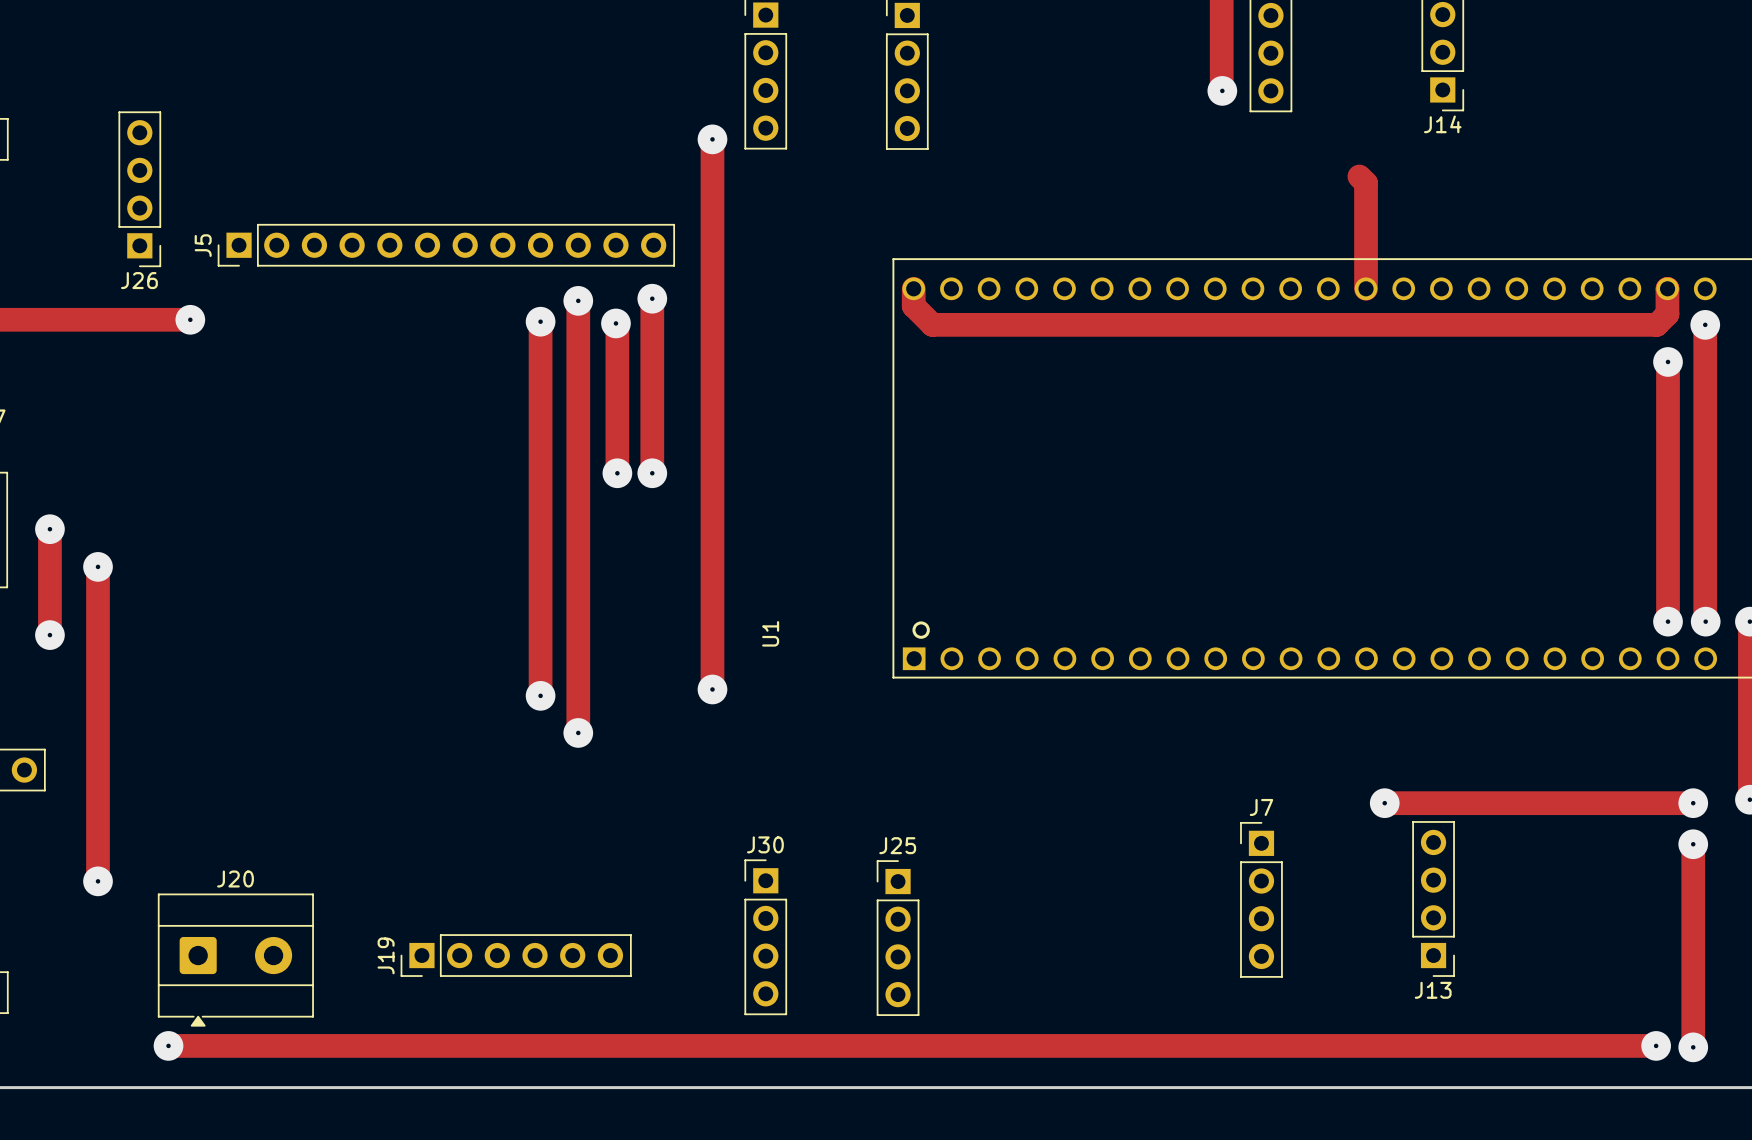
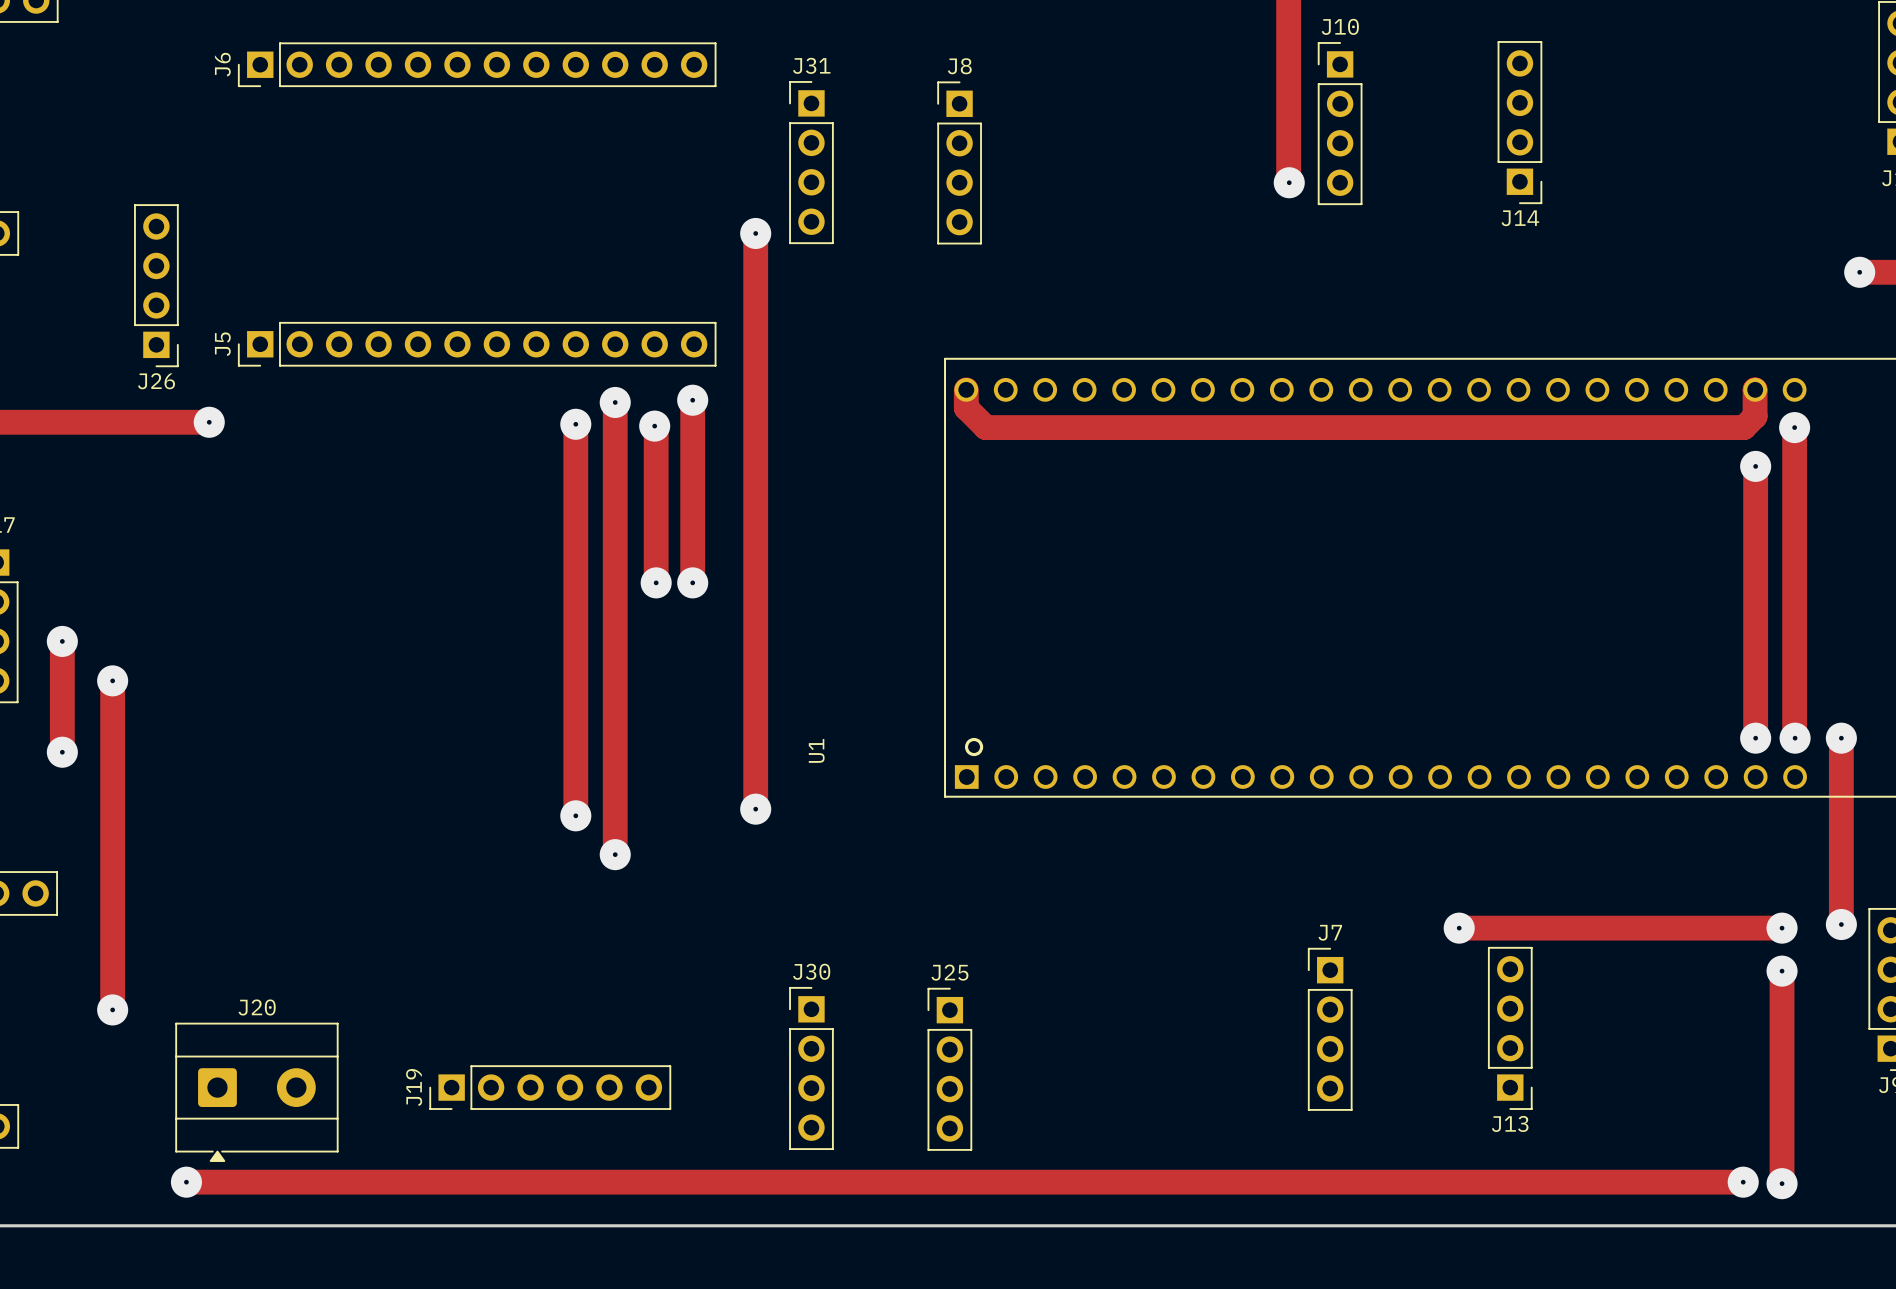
track: (1359, 176) (1366, 183) (1366, 288) -> none

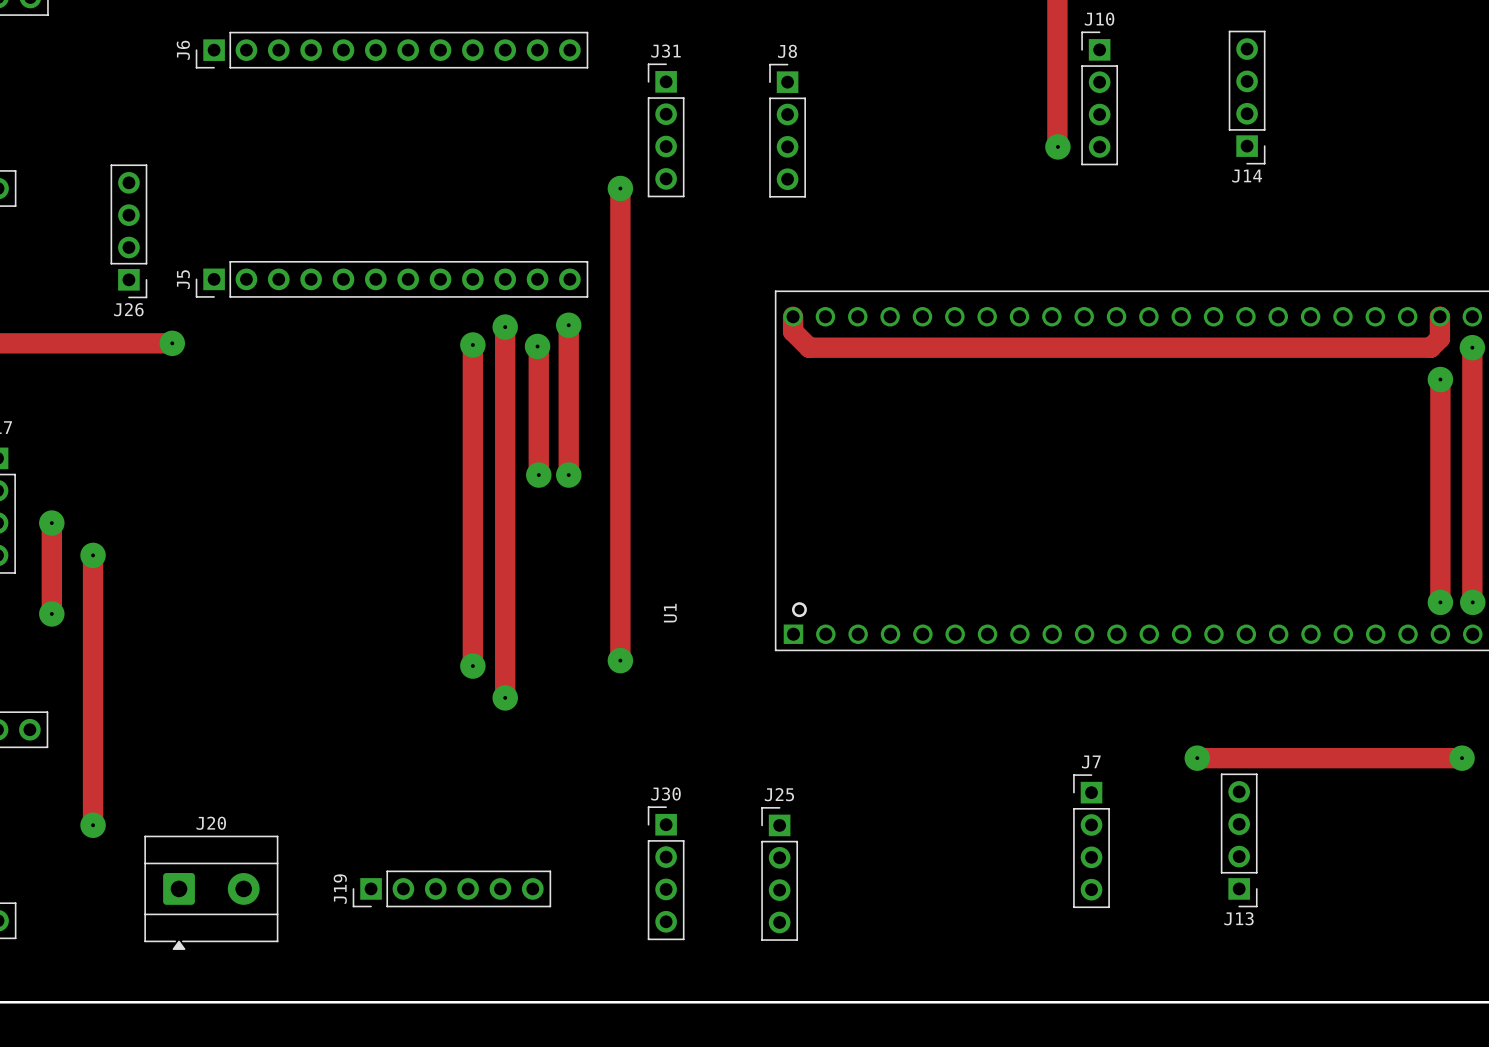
track: (1782, 971) (1782, 1183) -> none
via: (1782, 971) -> none
track: (186, 1182) (1743, 1182) -> none
via: (186, 1182) -> none
via: (1743, 1182) -> none
via: (1782, 1183) -> none

